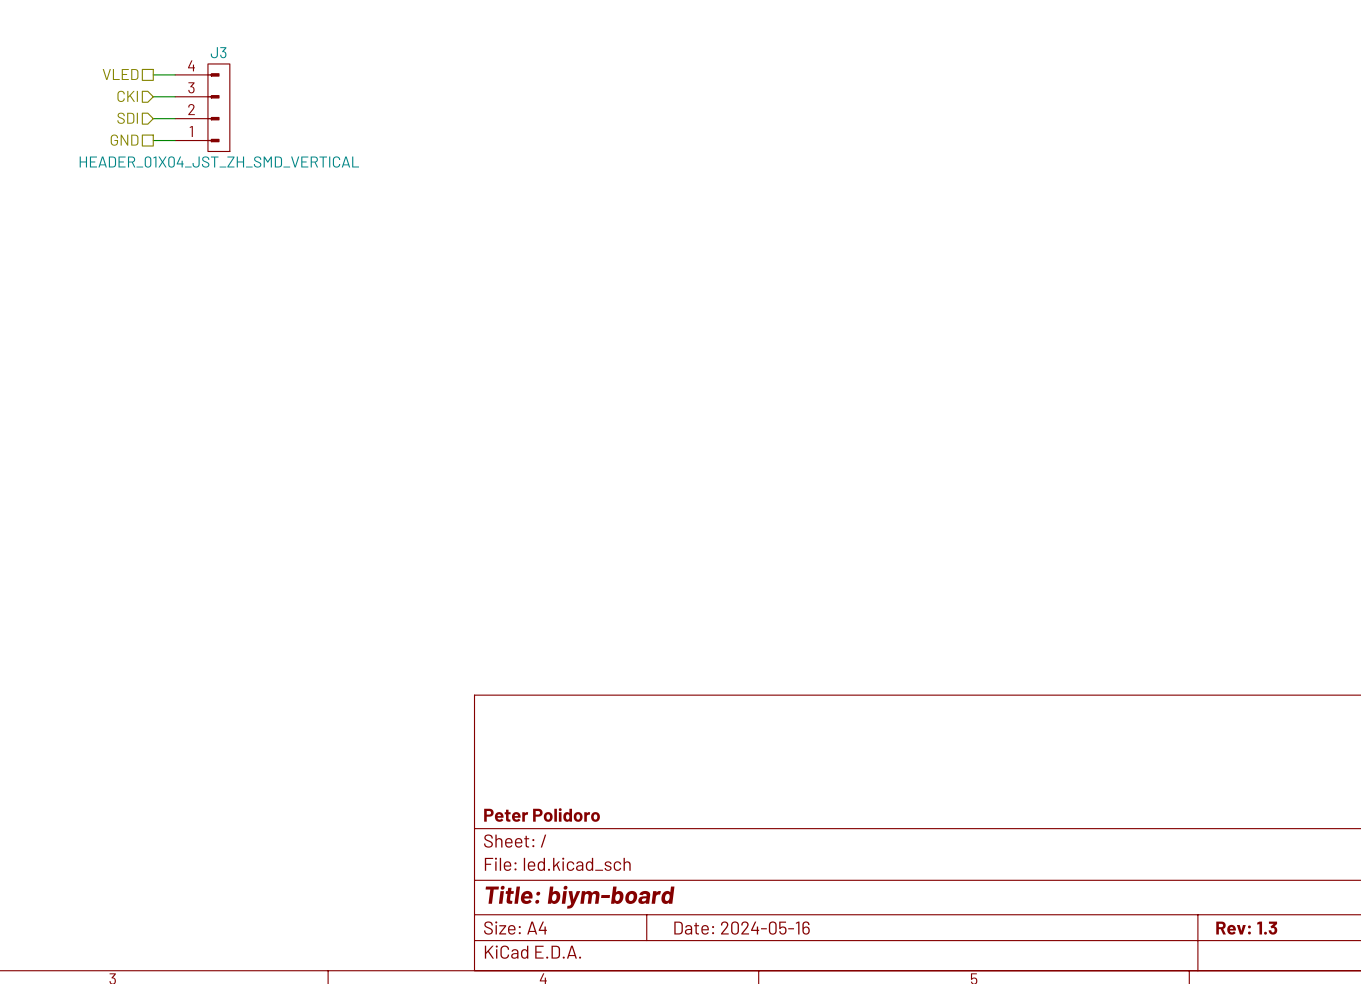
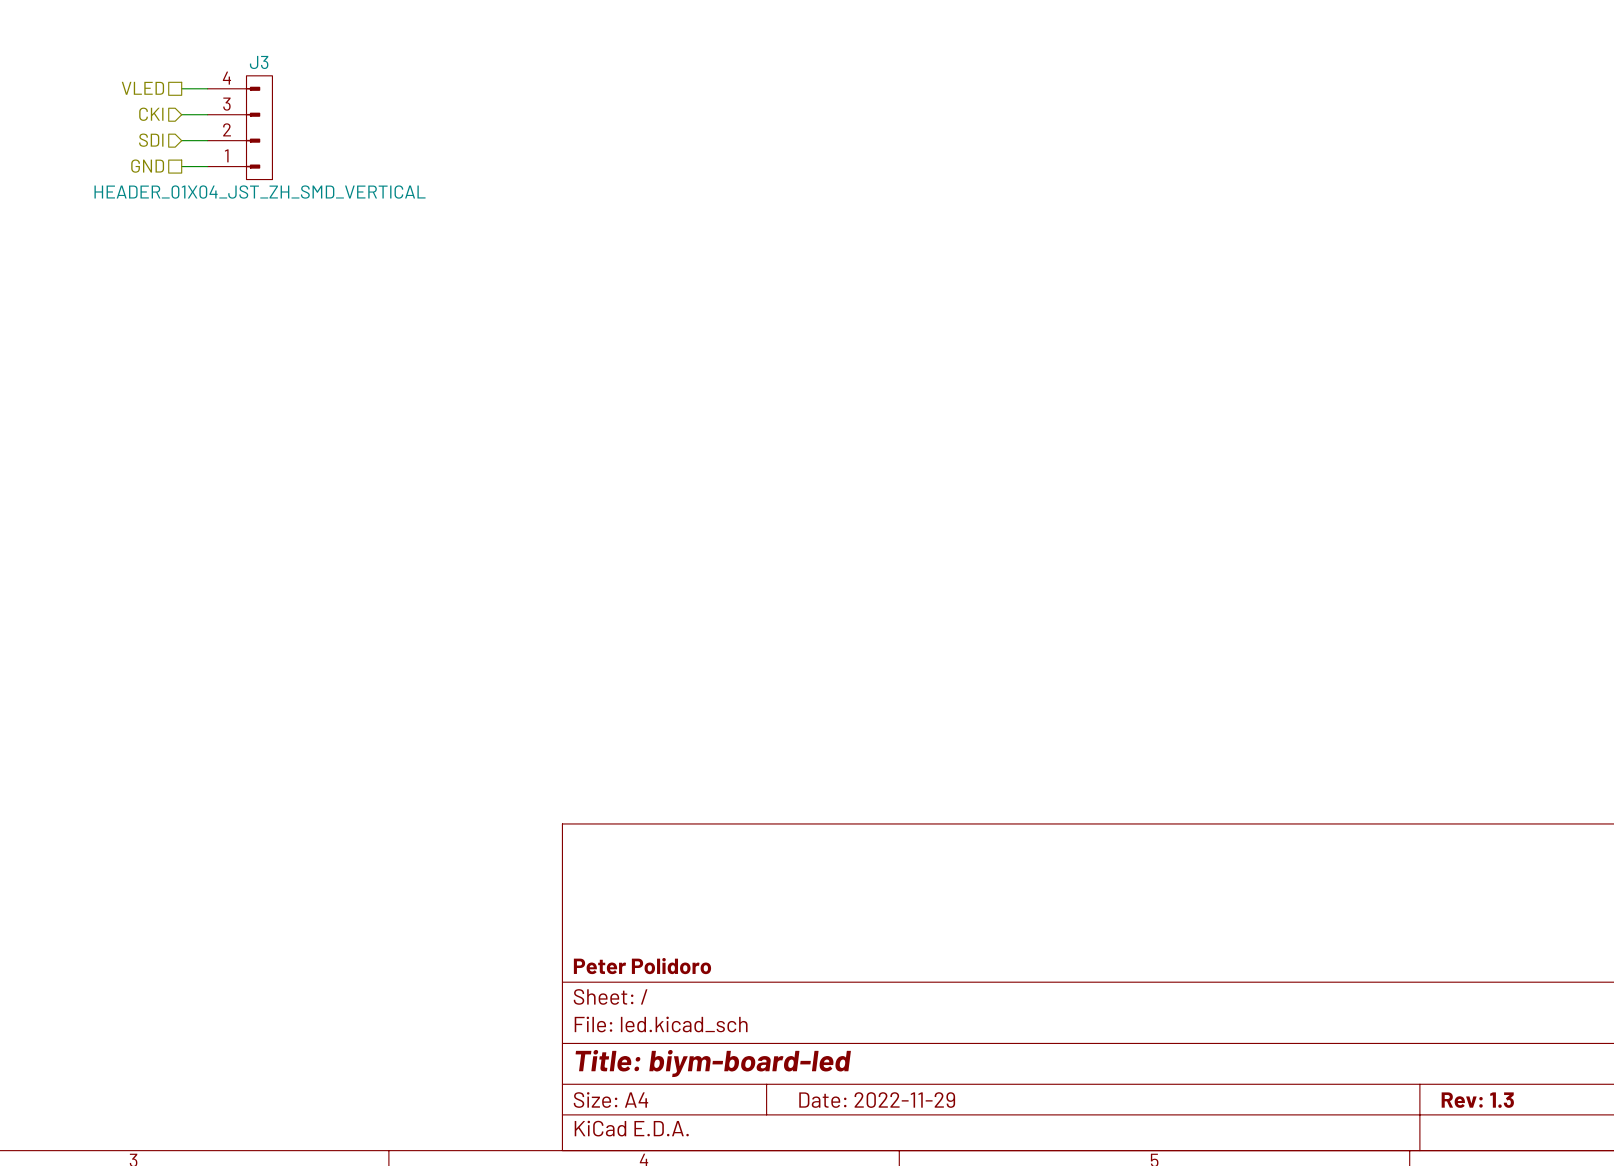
title block: Title: biym-board (580, 897) -> Title: biym-board-led (713, 1063)
title block: Date: 2024-05-16 (742, 928) -> Date: 2022-11-29 (877, 1100)

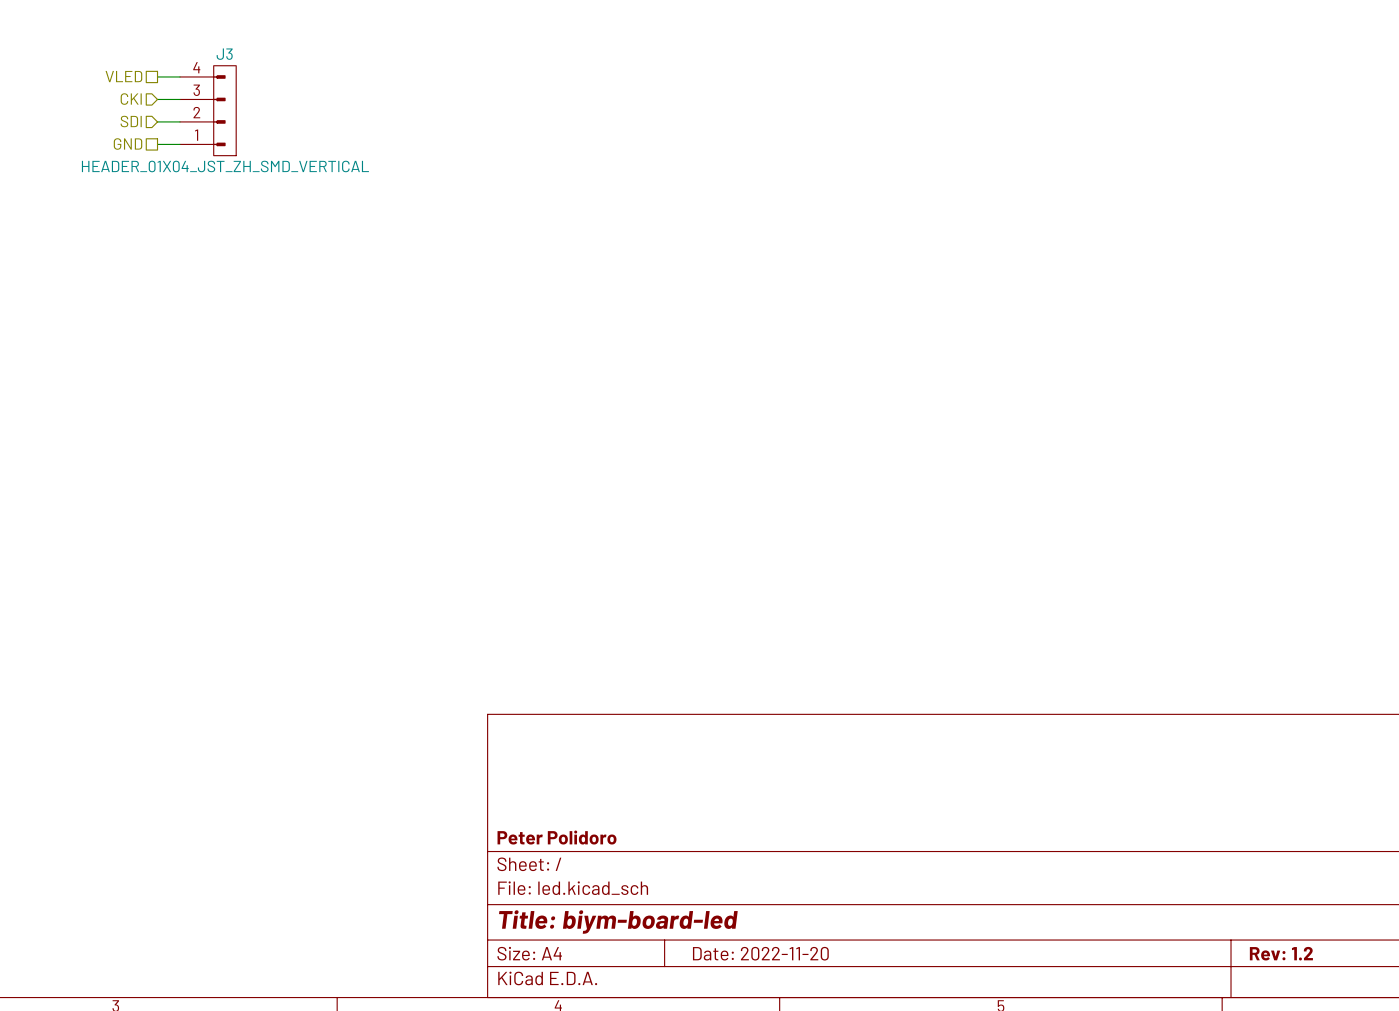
title block: Date: 2022-11-29 (877, 1100) -> Date: 2022-11-20 (760, 953)
title block: Rev: 1.3 (1477, 1100) -> Rev: 1.2 (1281, 953)

